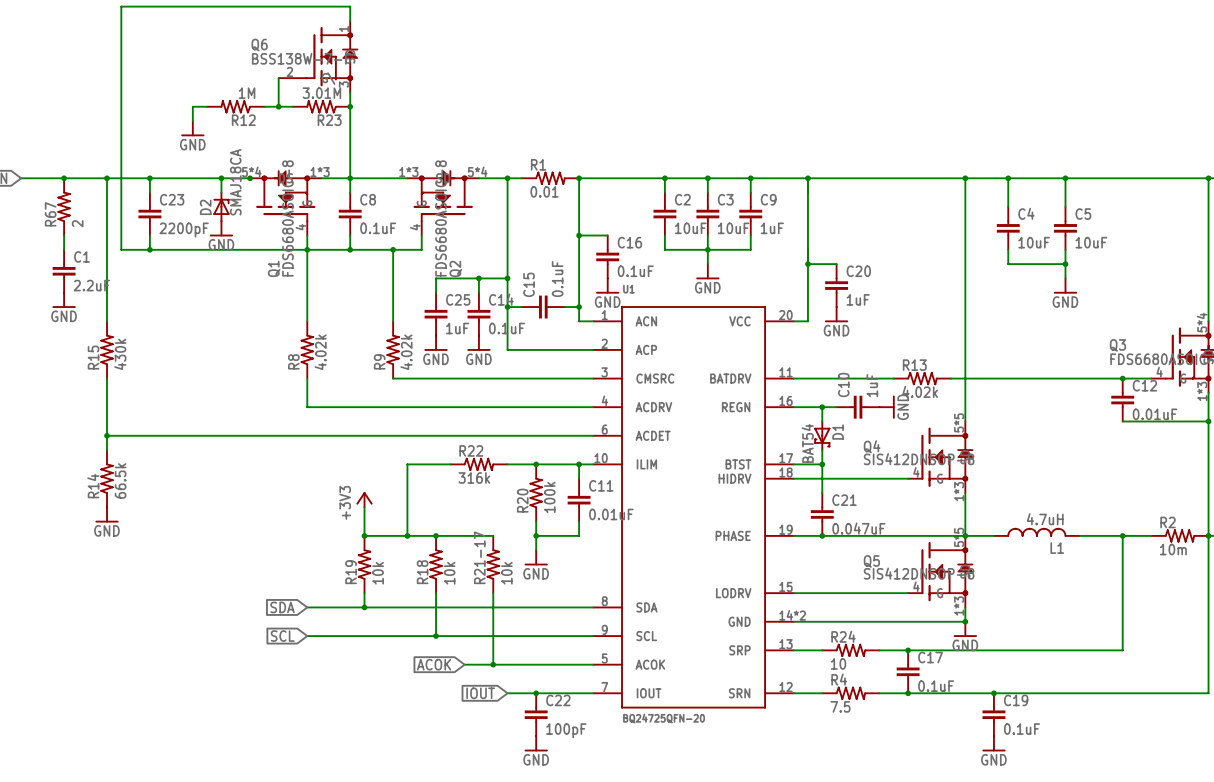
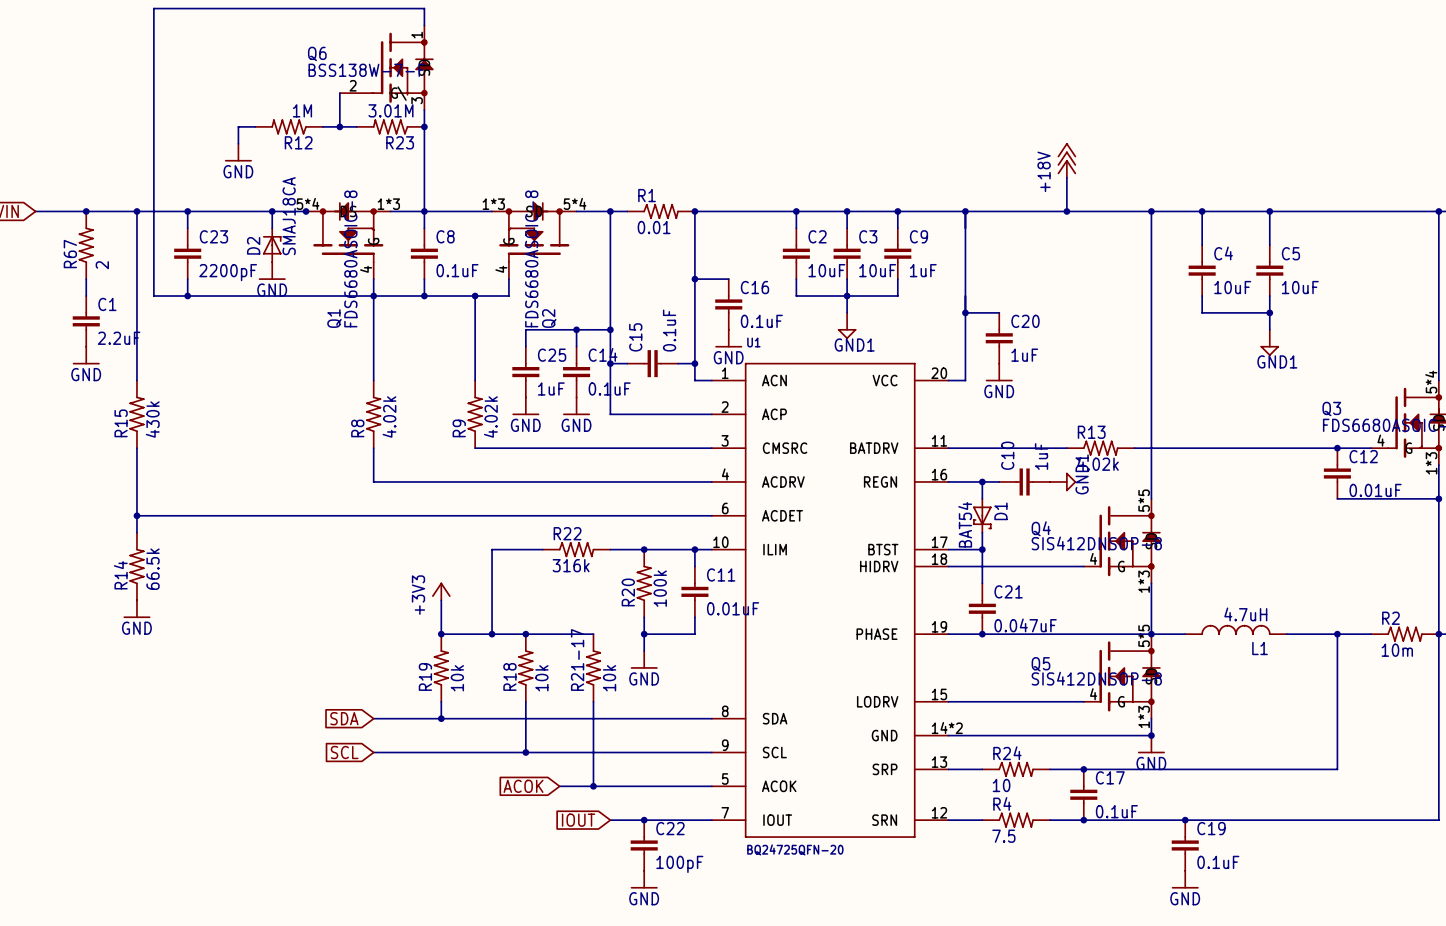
power symbol: none -> +18V (1066, 160)
wire: none -> (1066, 177) (1066, 211)
junction: none -> (1066, 211)
power symbol: GND (707, 271) -> GND1 (847, 326)
power symbol: GND (1065, 285) -> GND1 (1269, 342)
power symbol: GND (887, 407) -> GND1 (1063, 481)

